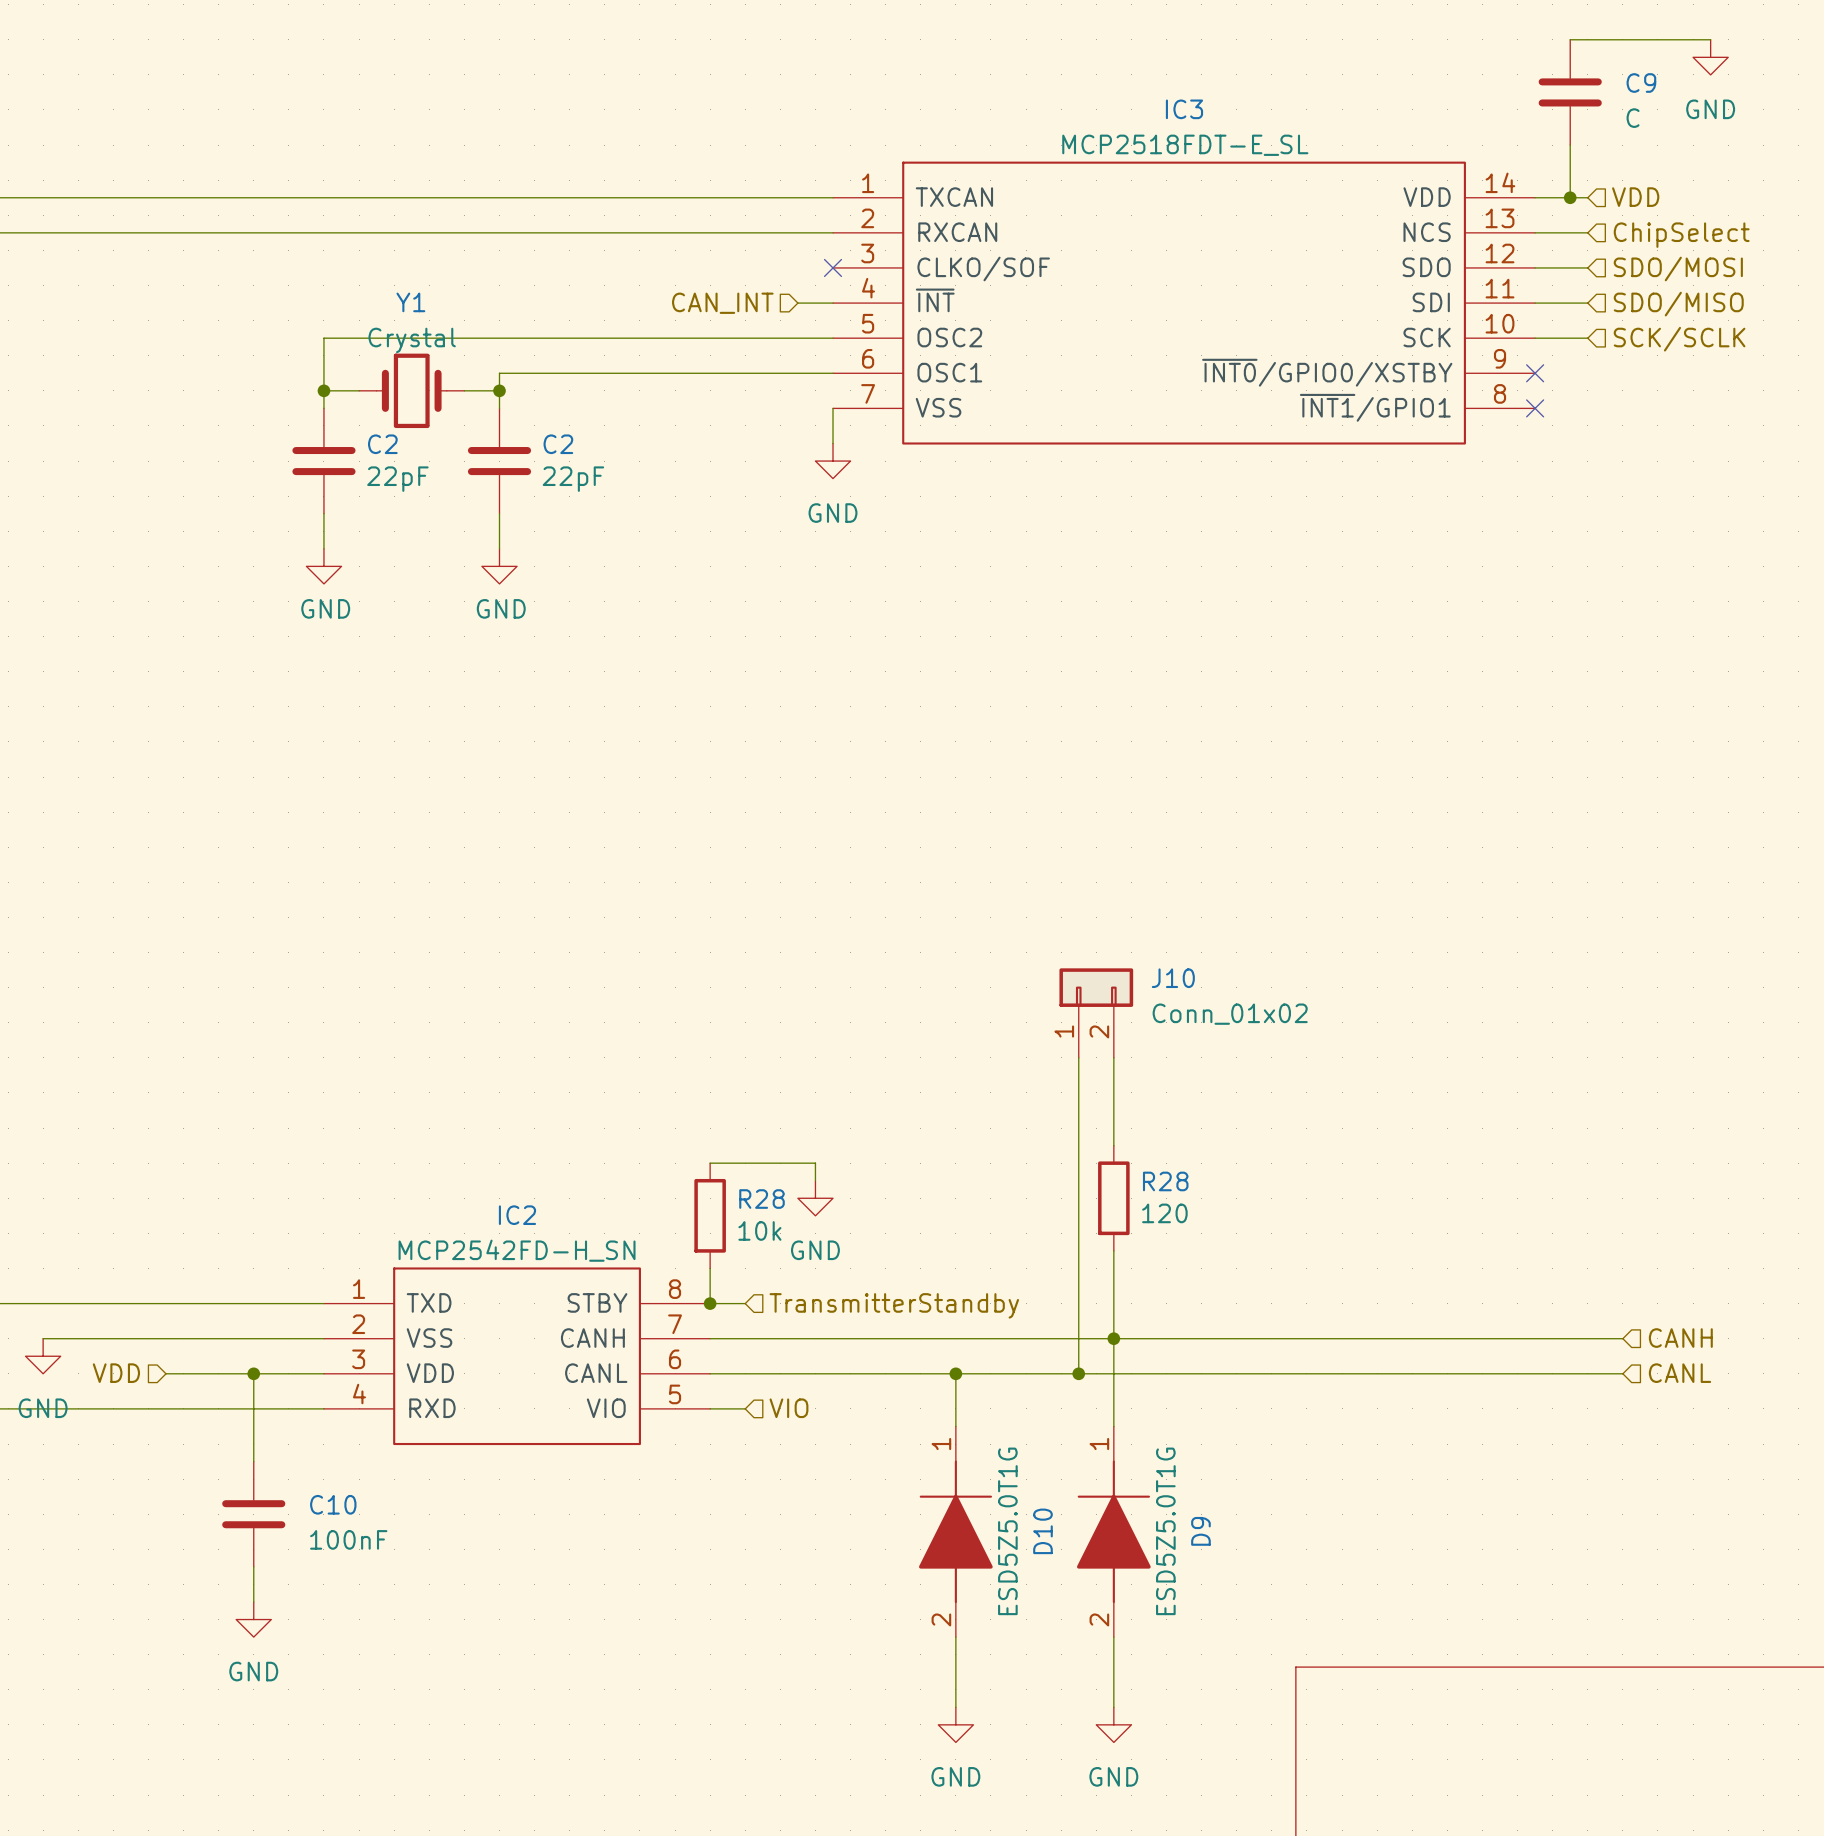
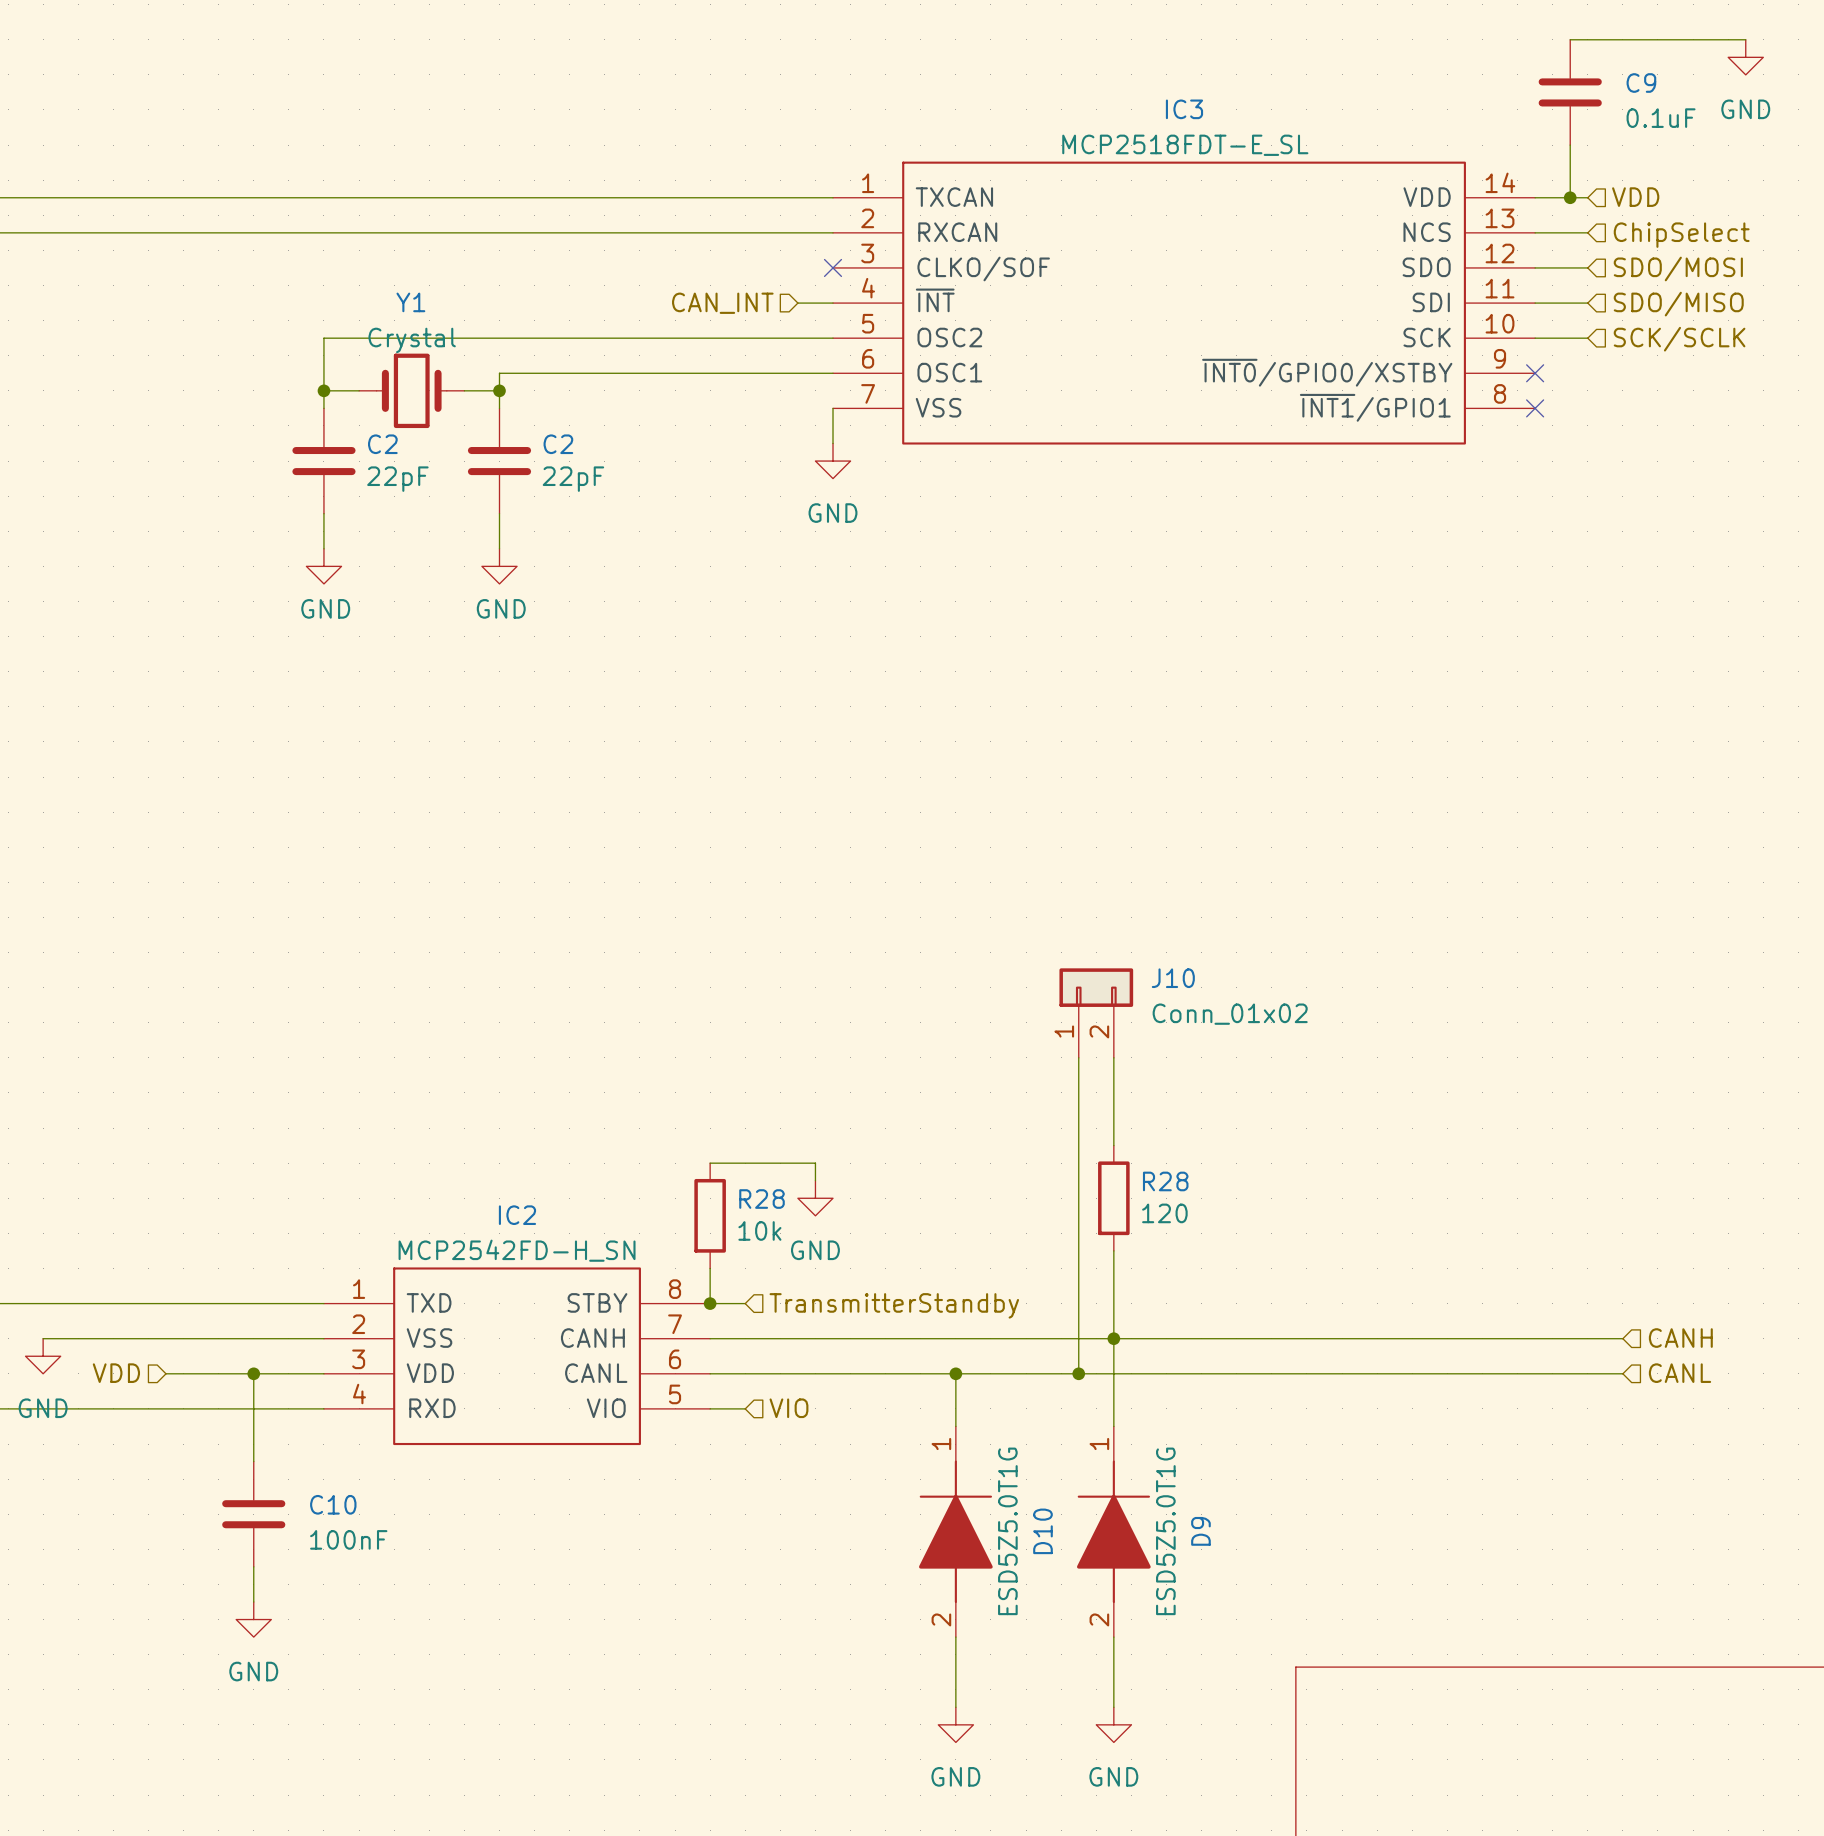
wire: none -> (1710, 39) (1745, 39)
power symbol position: GND (1710, 57) -> GND (1745, 57)
C9 value: C (1633, 118) -> 0.1uF (1661, 118)

